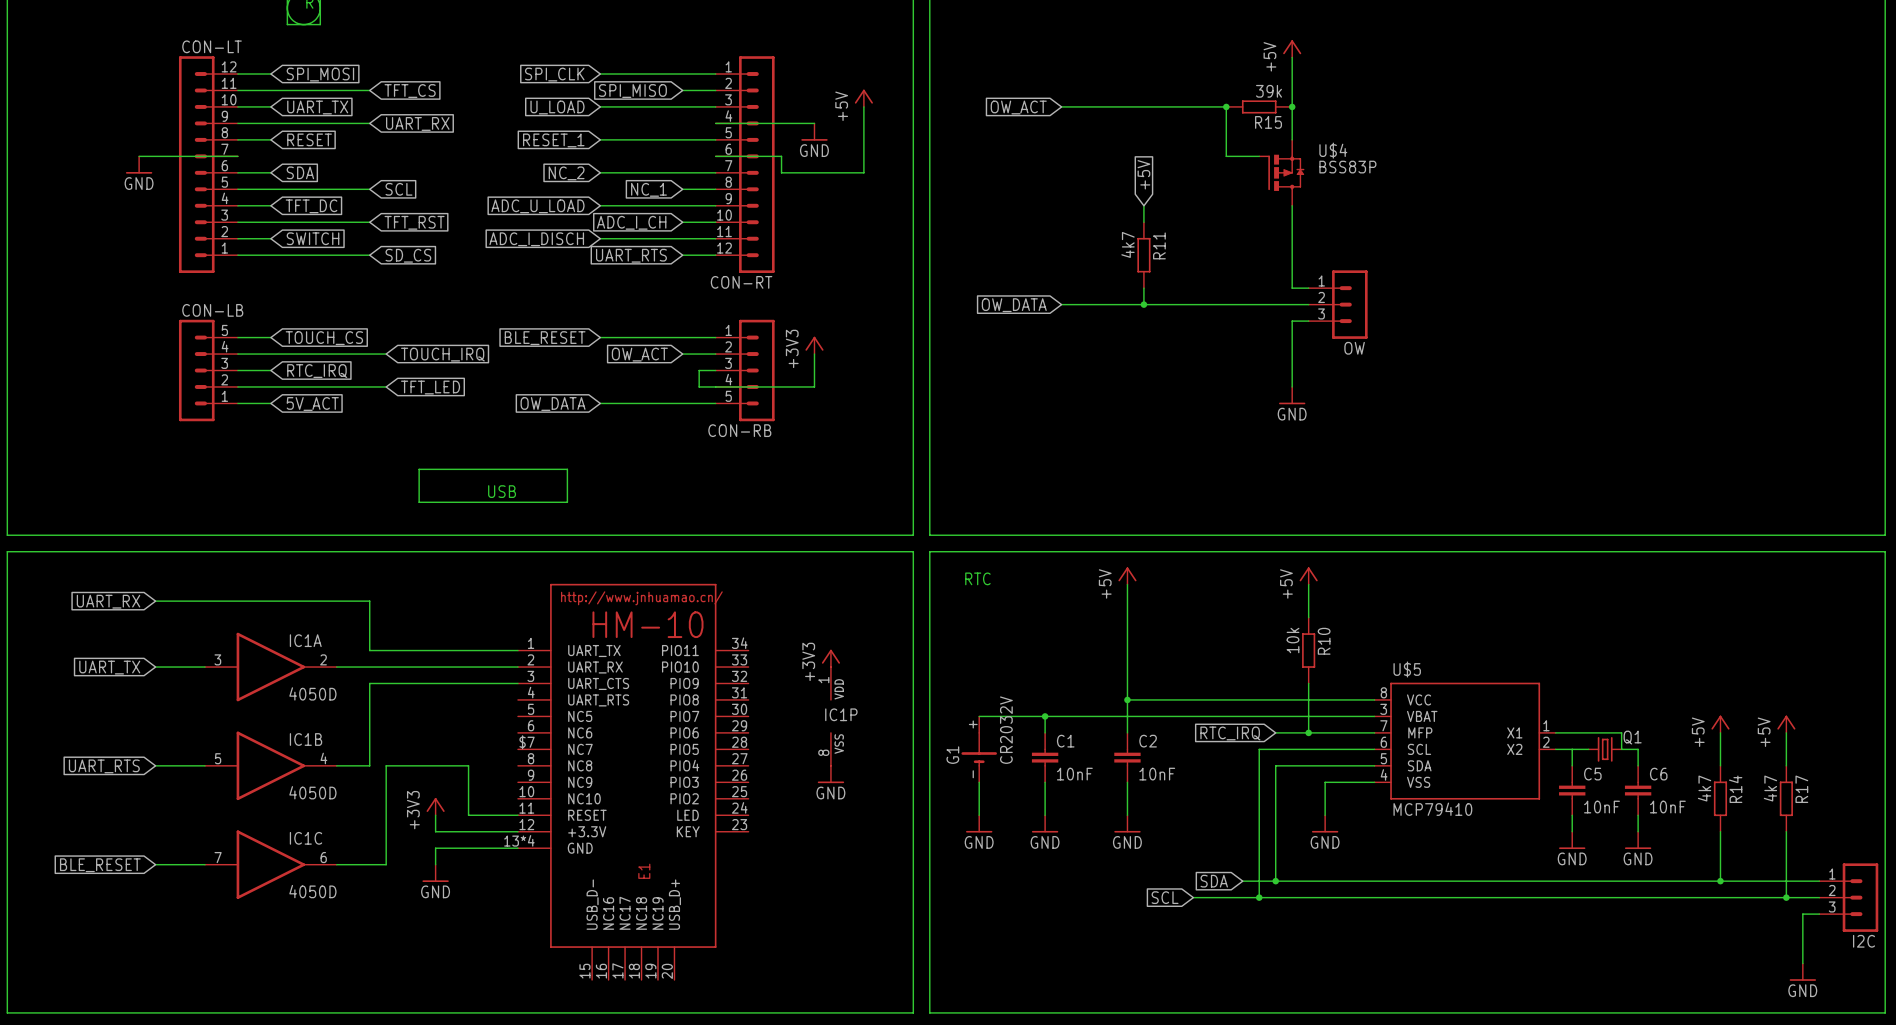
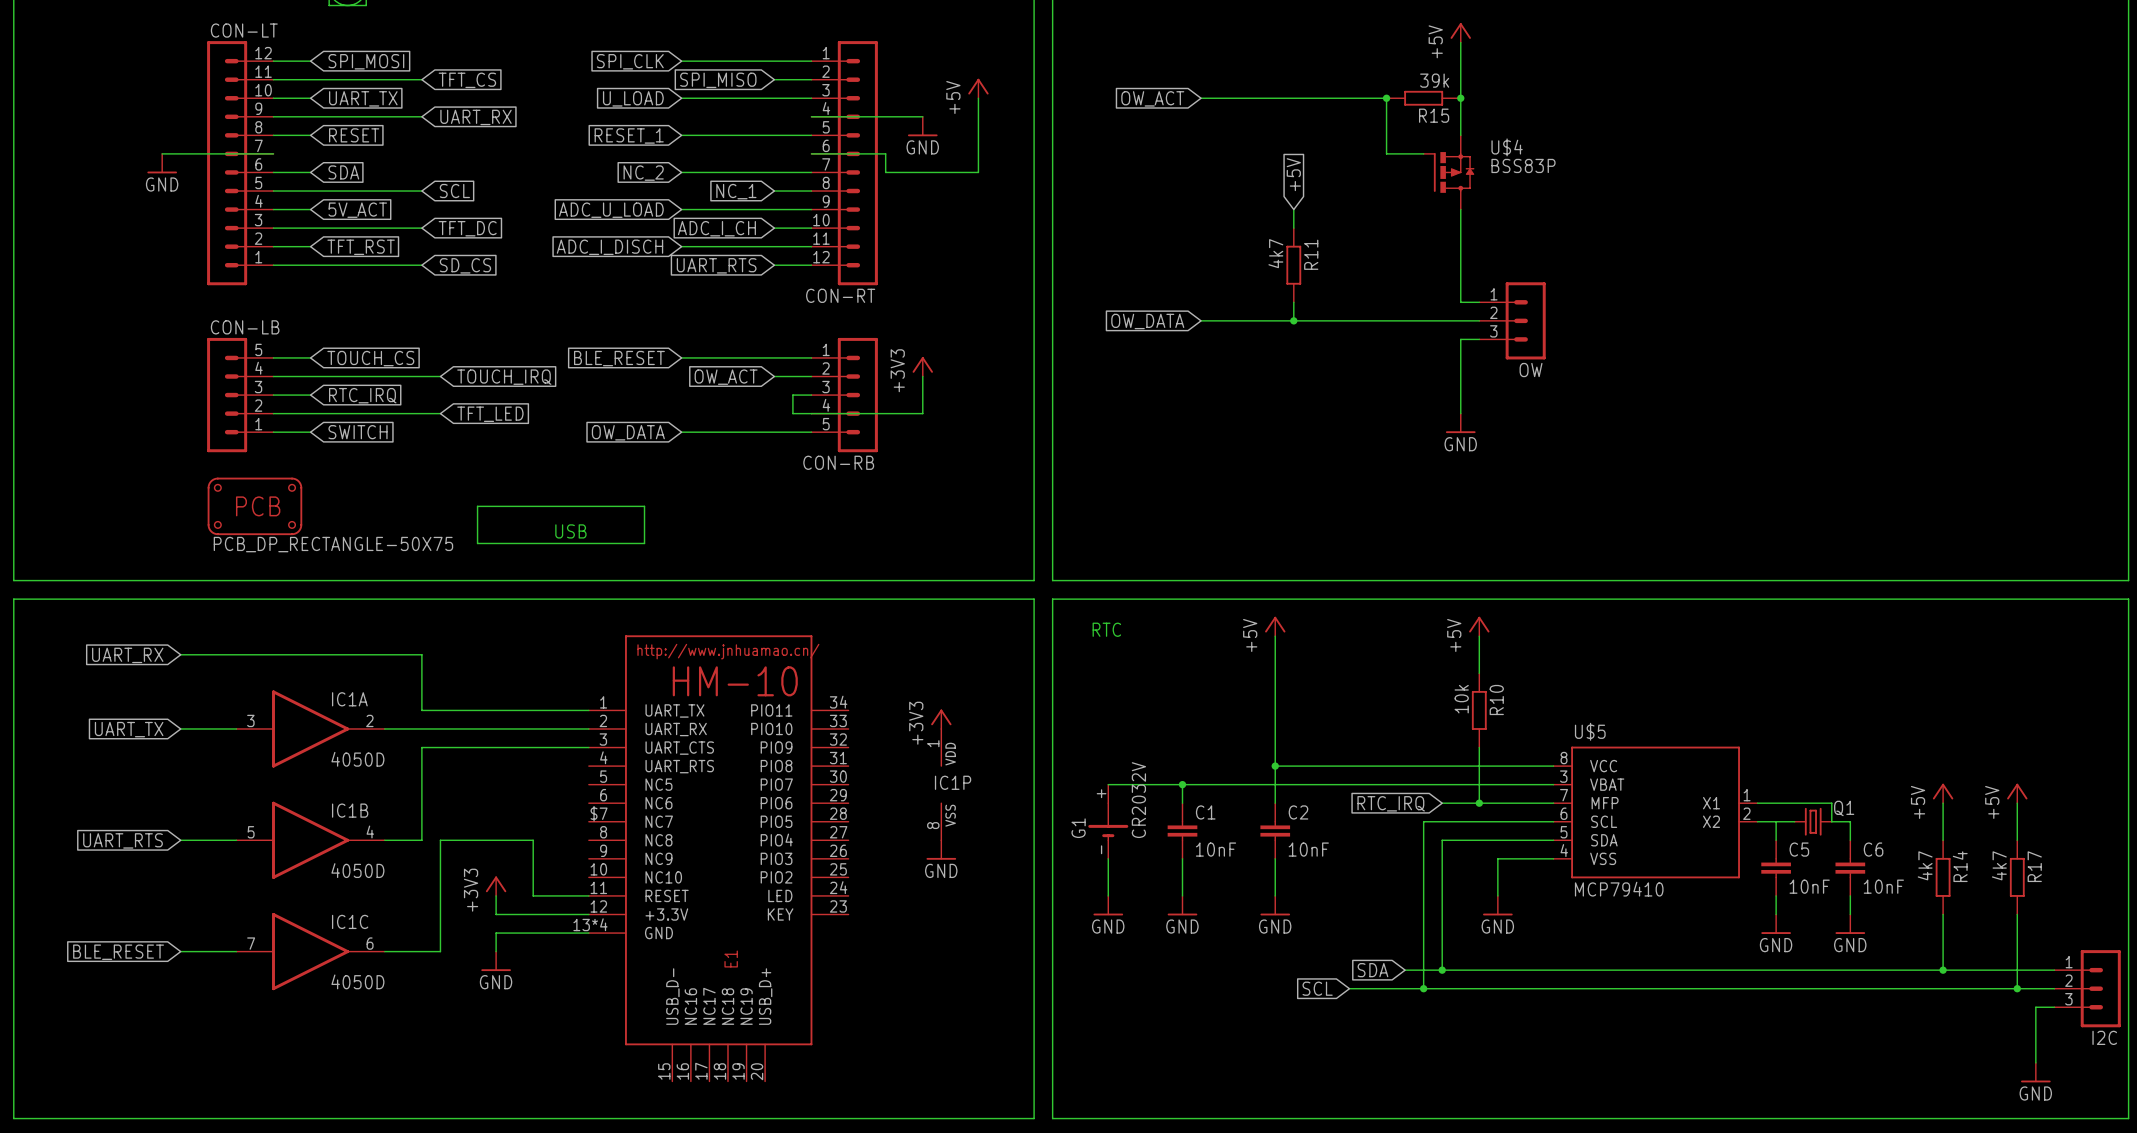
global label: TFT_DC (311, 206) -> 5V_ACT (357, 210)
global label: TFT_RST (414, 222) -> TFT_DC (467, 228)
global label: SWITCH (313, 238) -> TFT_RST (361, 247)
global label: 5V_ACT (312, 404) -> SWITCH (358, 432)
part: none -> PCB_DP_RECTANGLE-50X75 (254, 506)

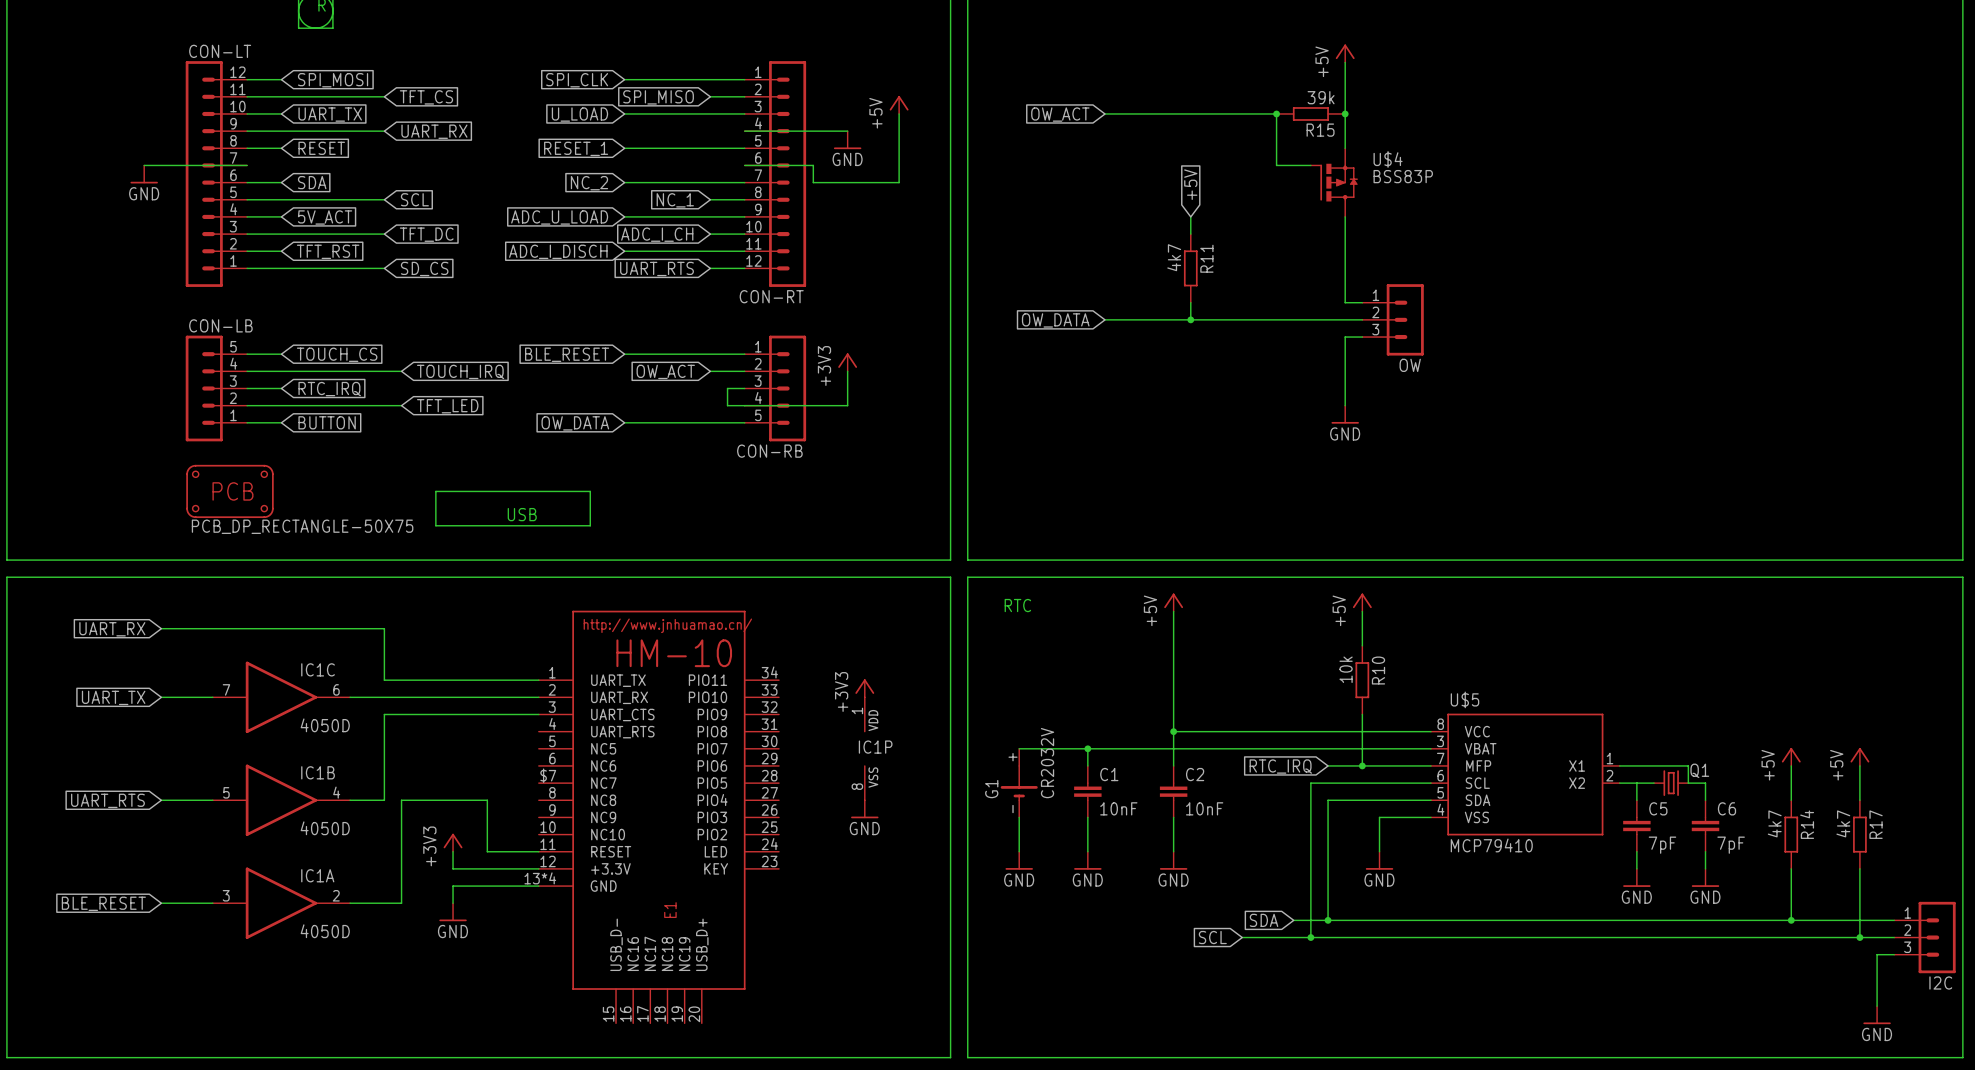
global label: SWITCH (358, 432) -> BUTTON (327, 422)
IC1A position: (310, 728) -> (281, 903)
C5 value: 10nF (1809, 886) -> 7pF (1662, 845)
C6 value: 10nF (1883, 886) -> 7pF (1731, 845)
IC1C position: (310, 951) -> (281, 697)

